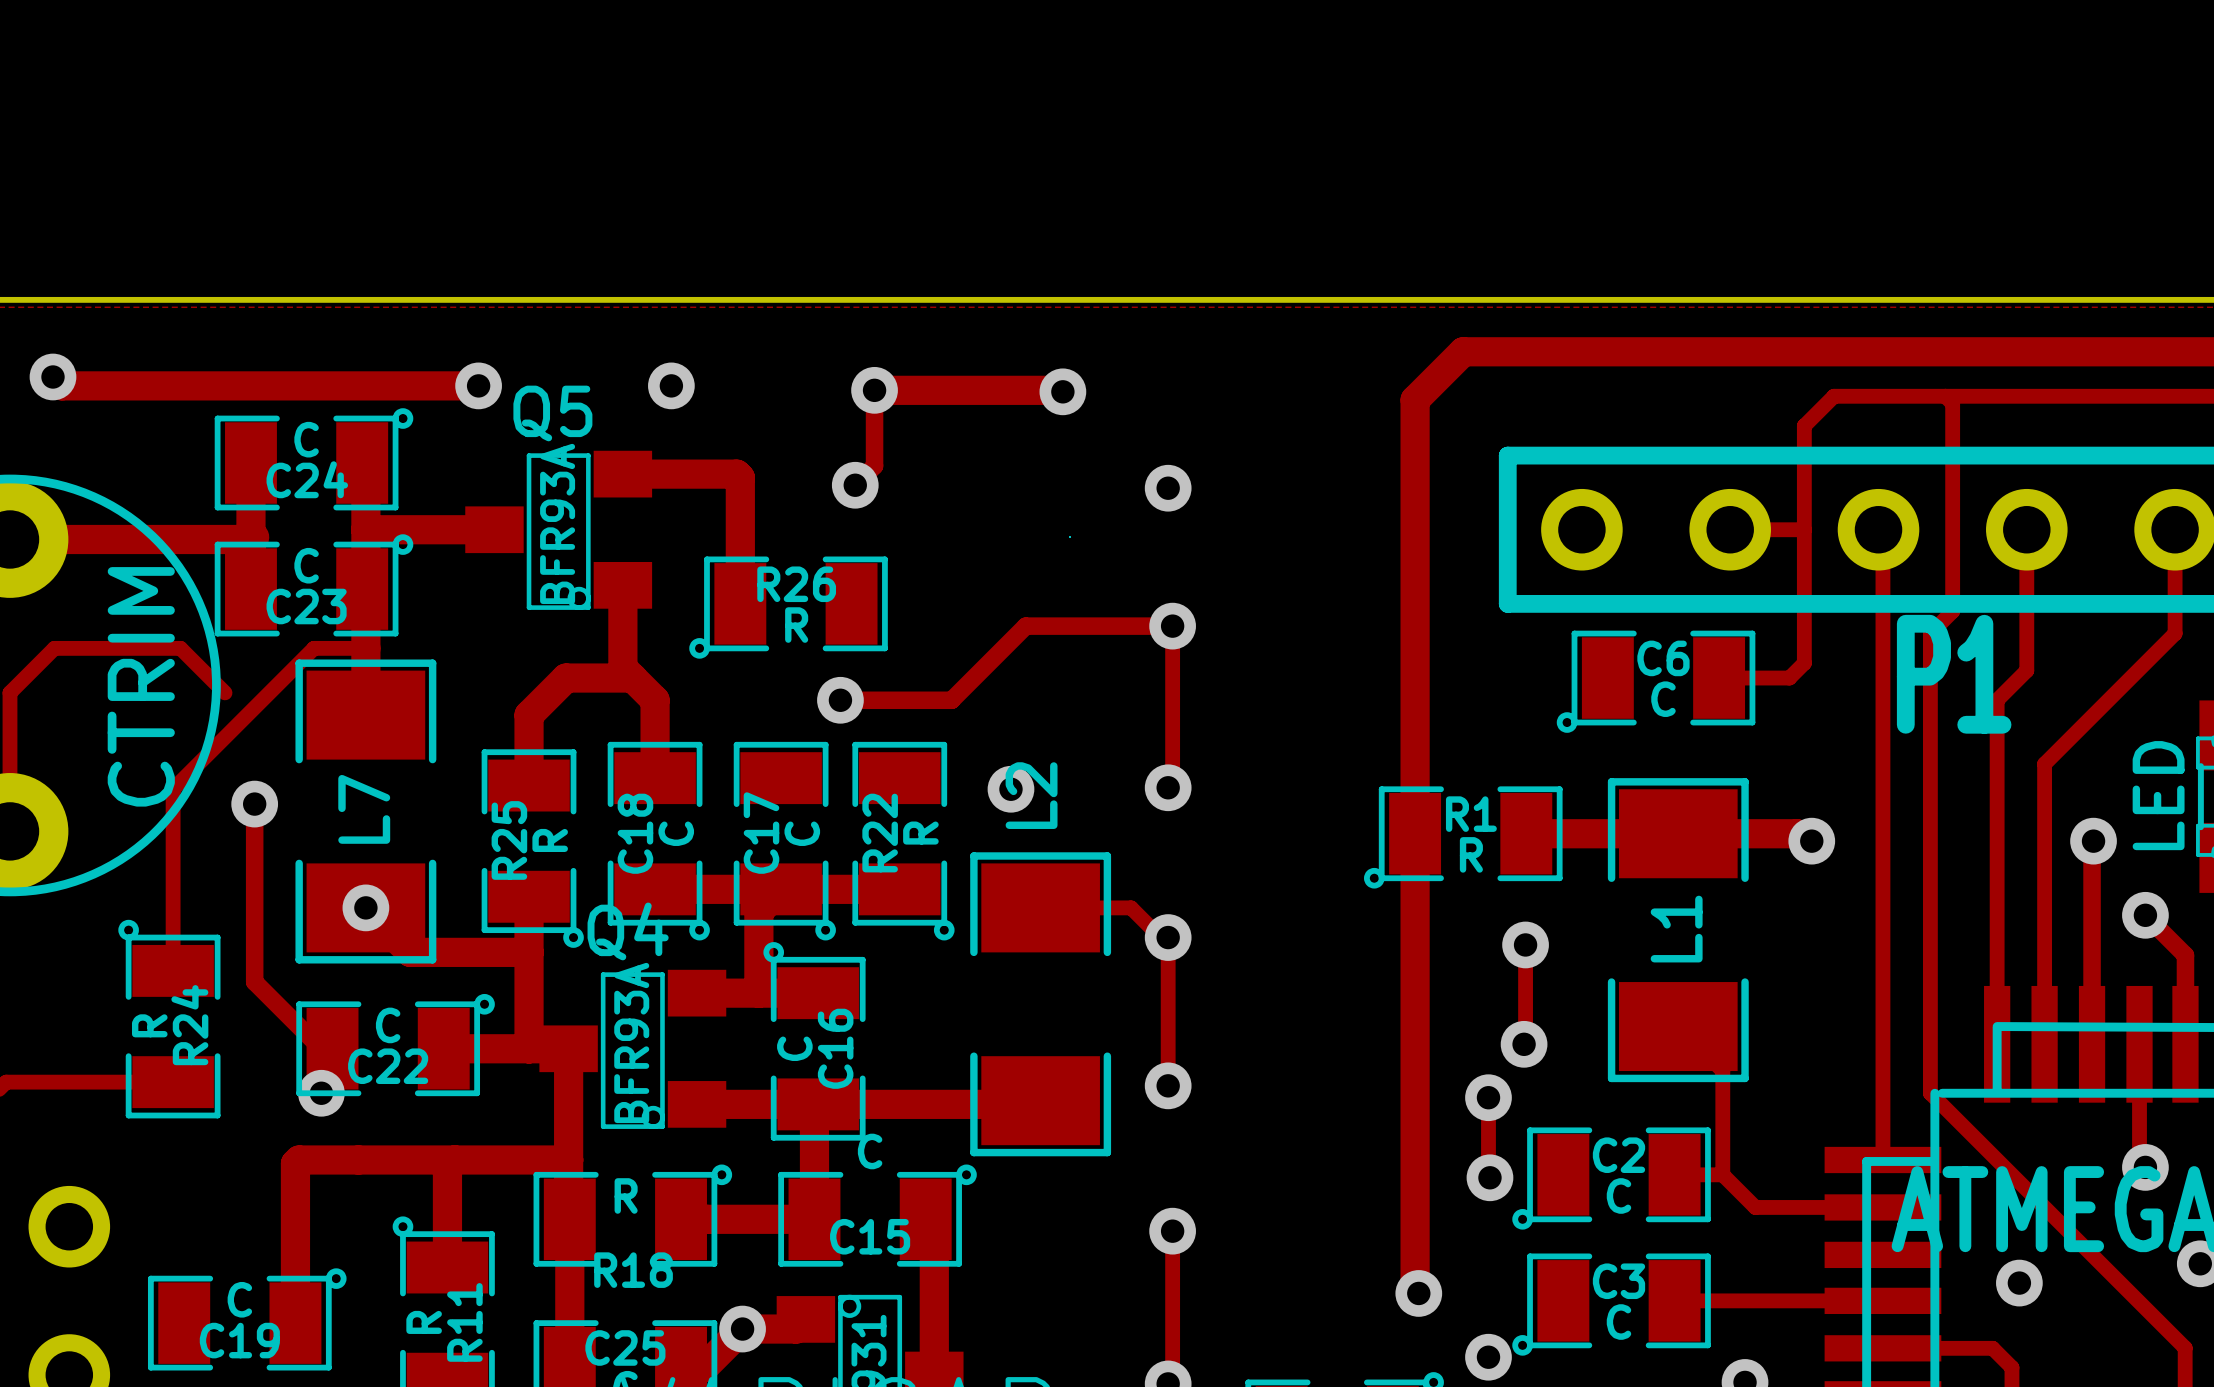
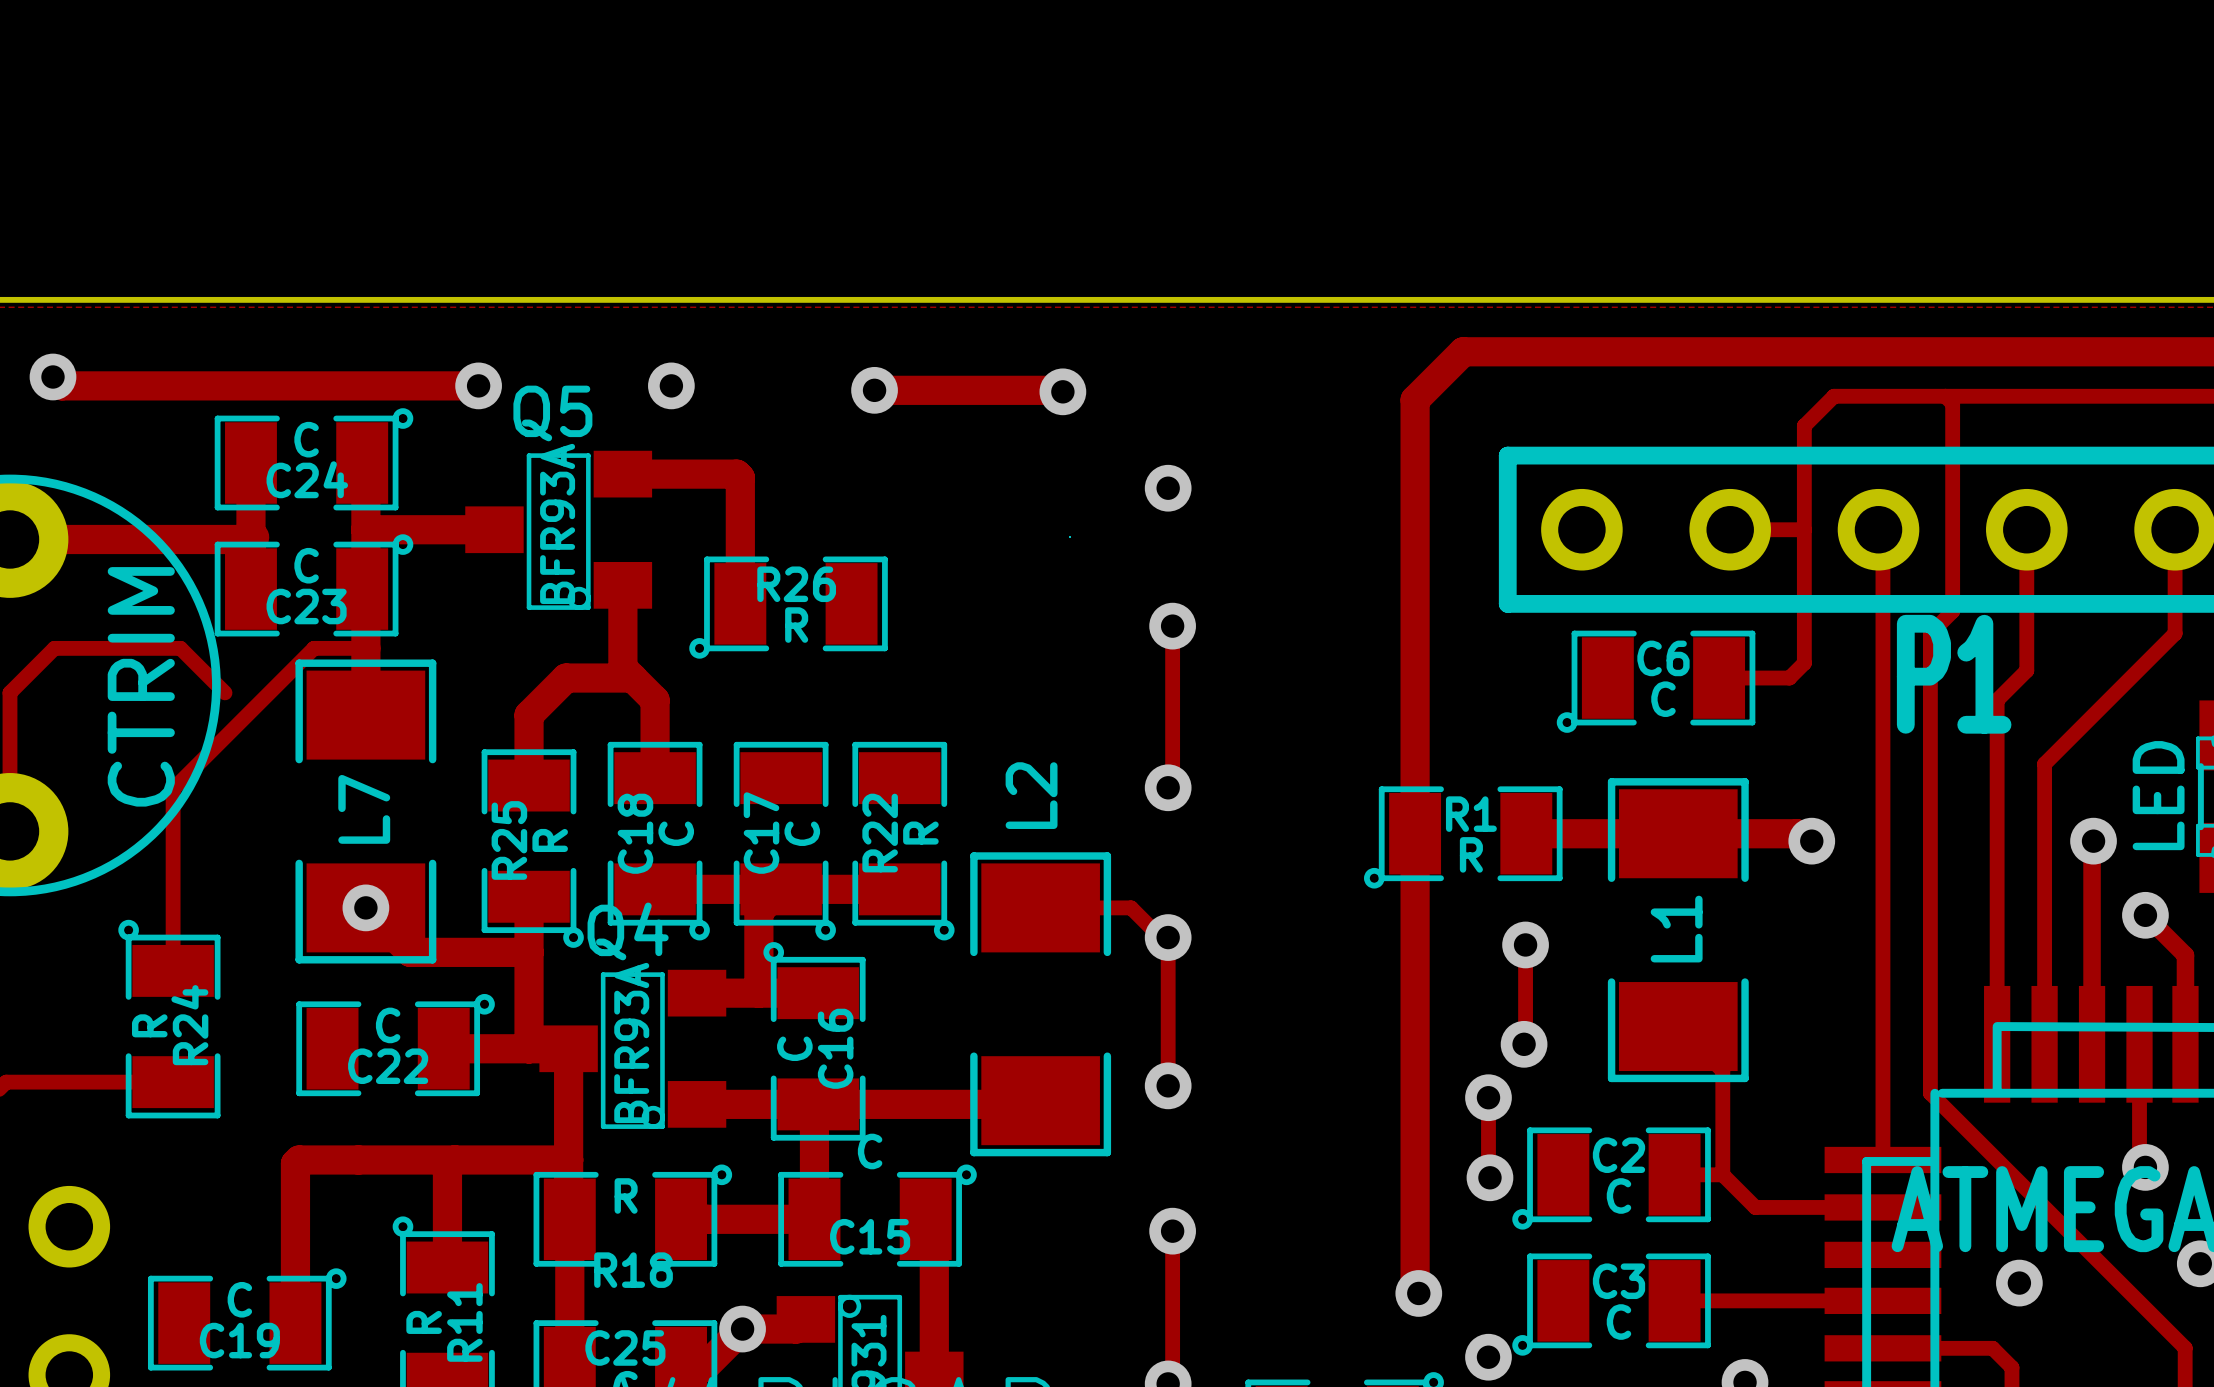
track: (874, 390) (874, 465) (855, 485) -> none
via: (855, 485) -> none
track: (1172, 626) (1025, 626) (951, 700) (840, 700) -> none
via: (840, 700) -> none
via: (1010, 789) -> none
track: (254, 804) (254, 982) (321, 1048) (321, 1093) (332, 1082) (332, 1048) -> none
via: (254, 804) -> none
via: (321, 1093) -> none

